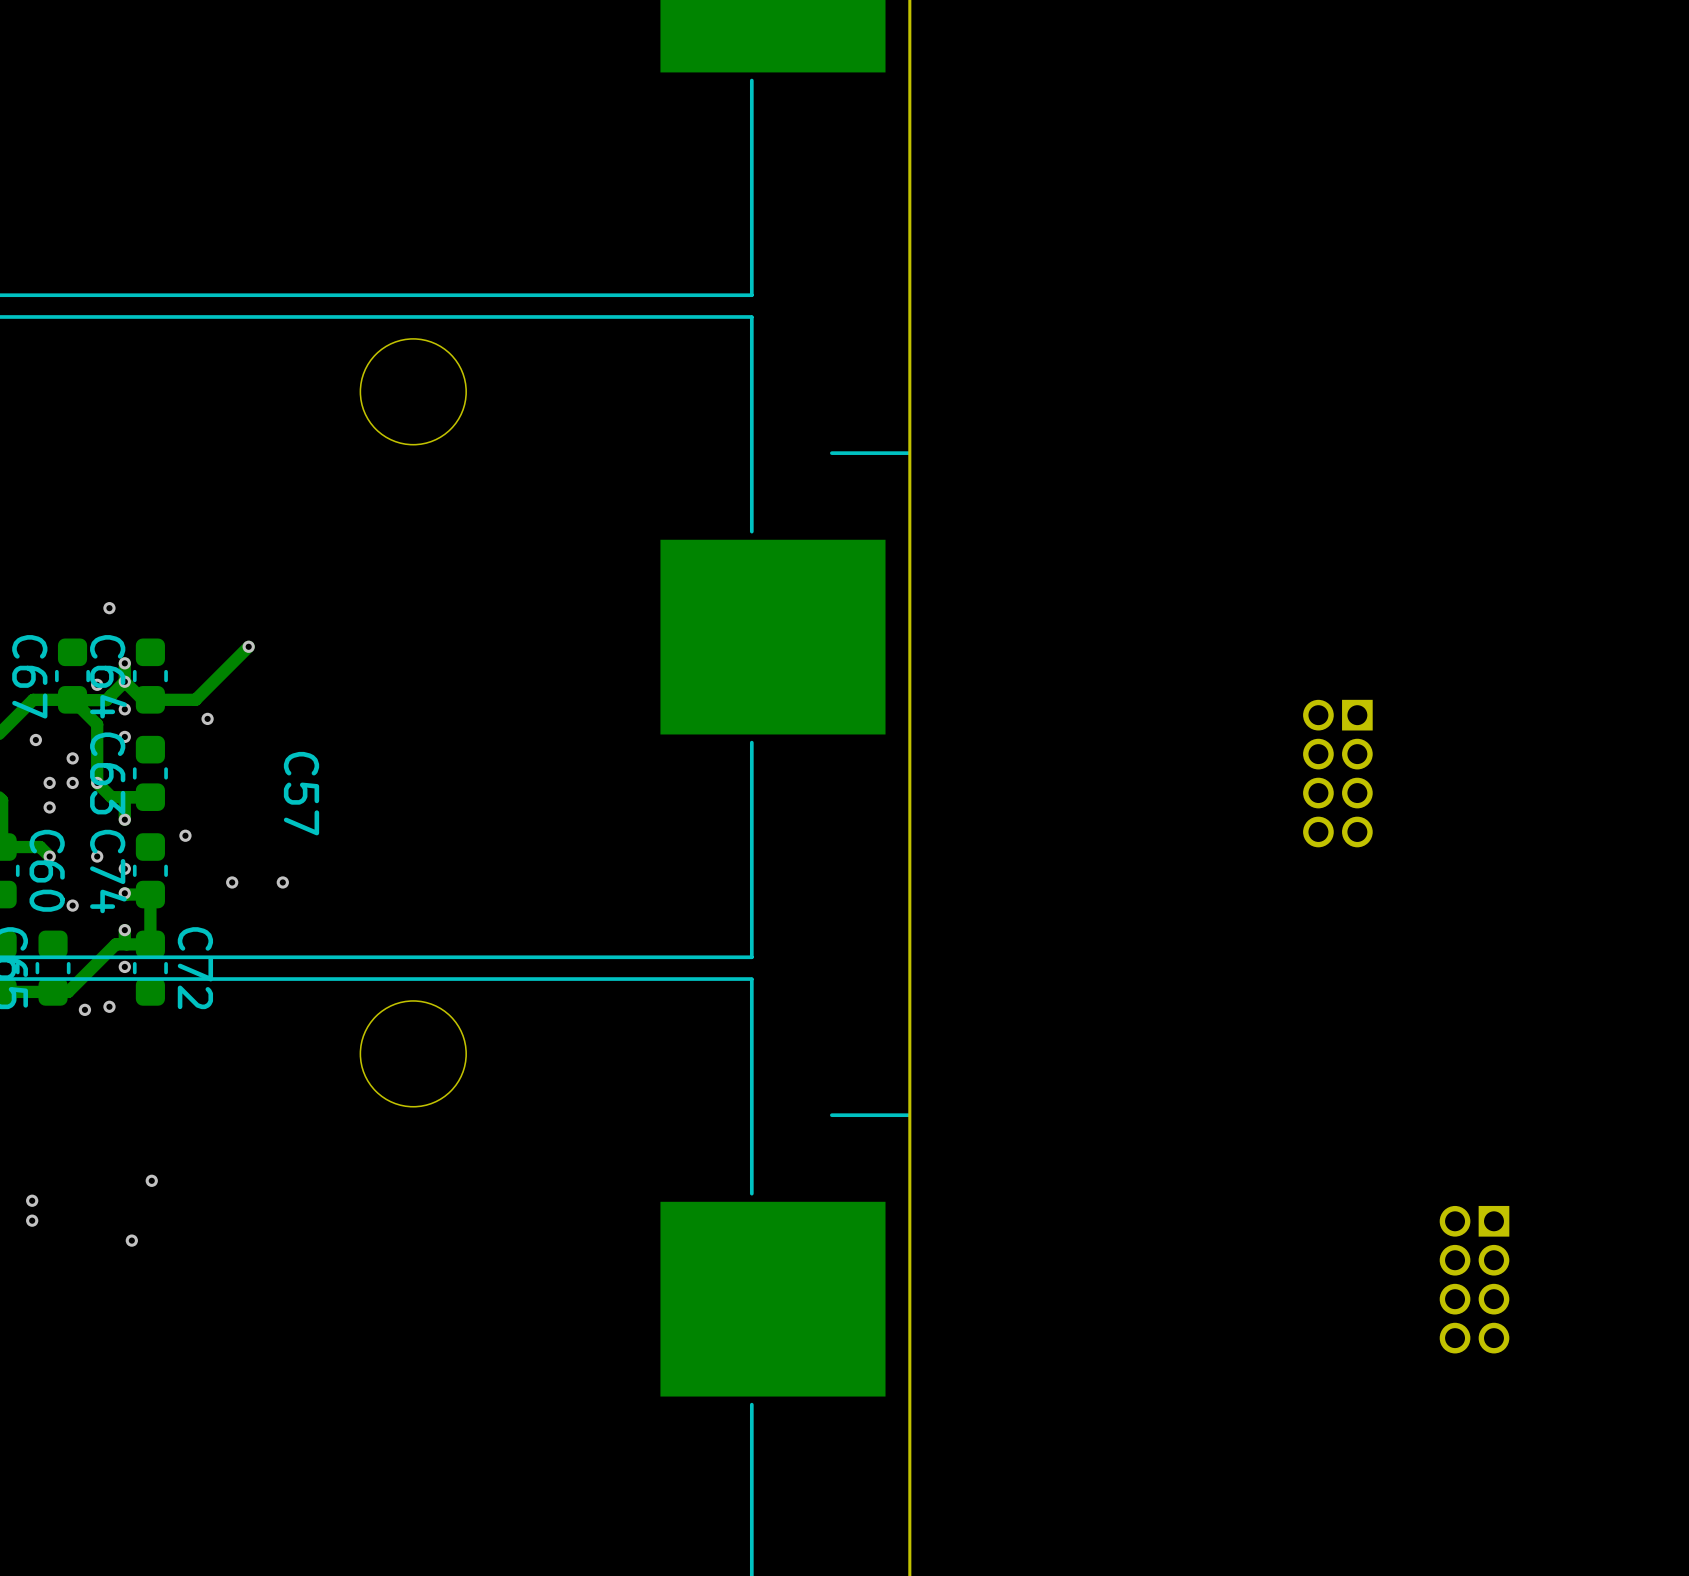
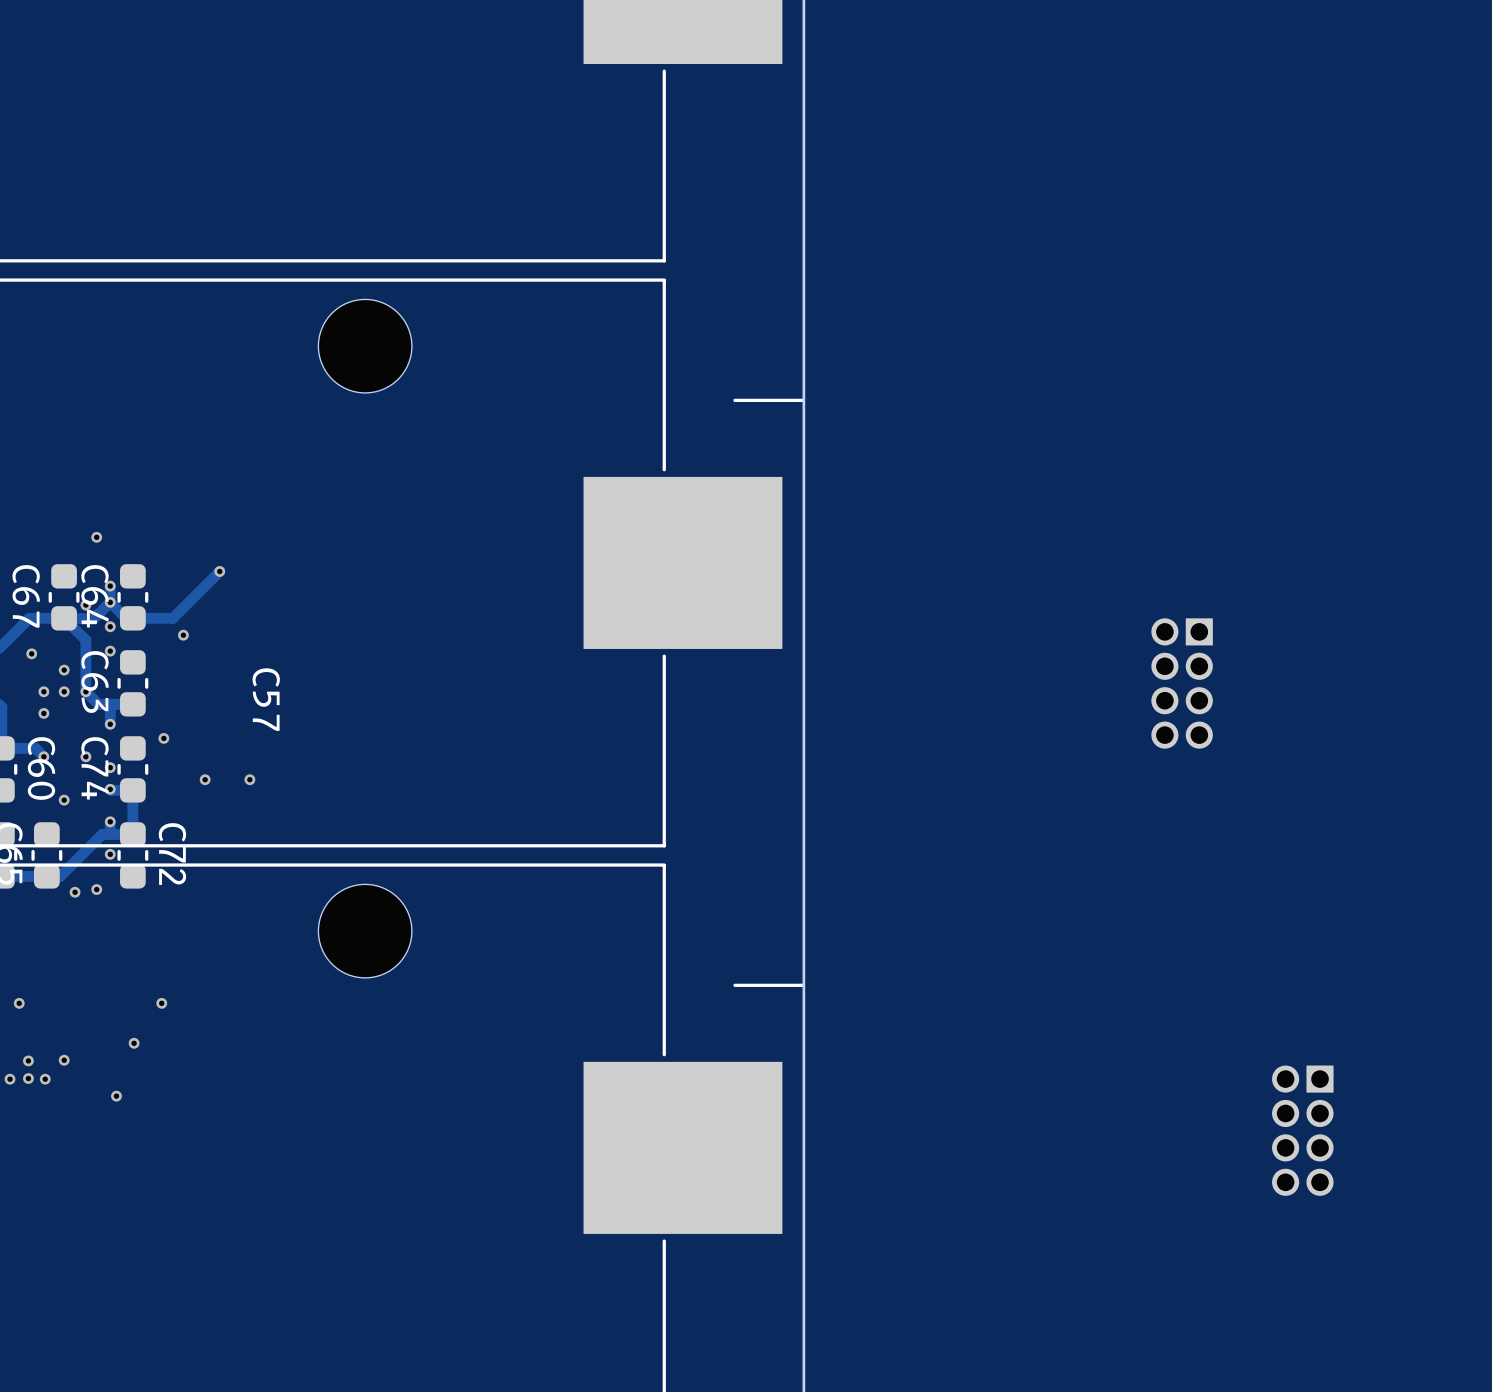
via: none -> (19, 1003)
via: none -> (161, 1003)
via: none -> (64, 1060)
via: none -> (10, 1079)
via: none -> (45, 1079)

